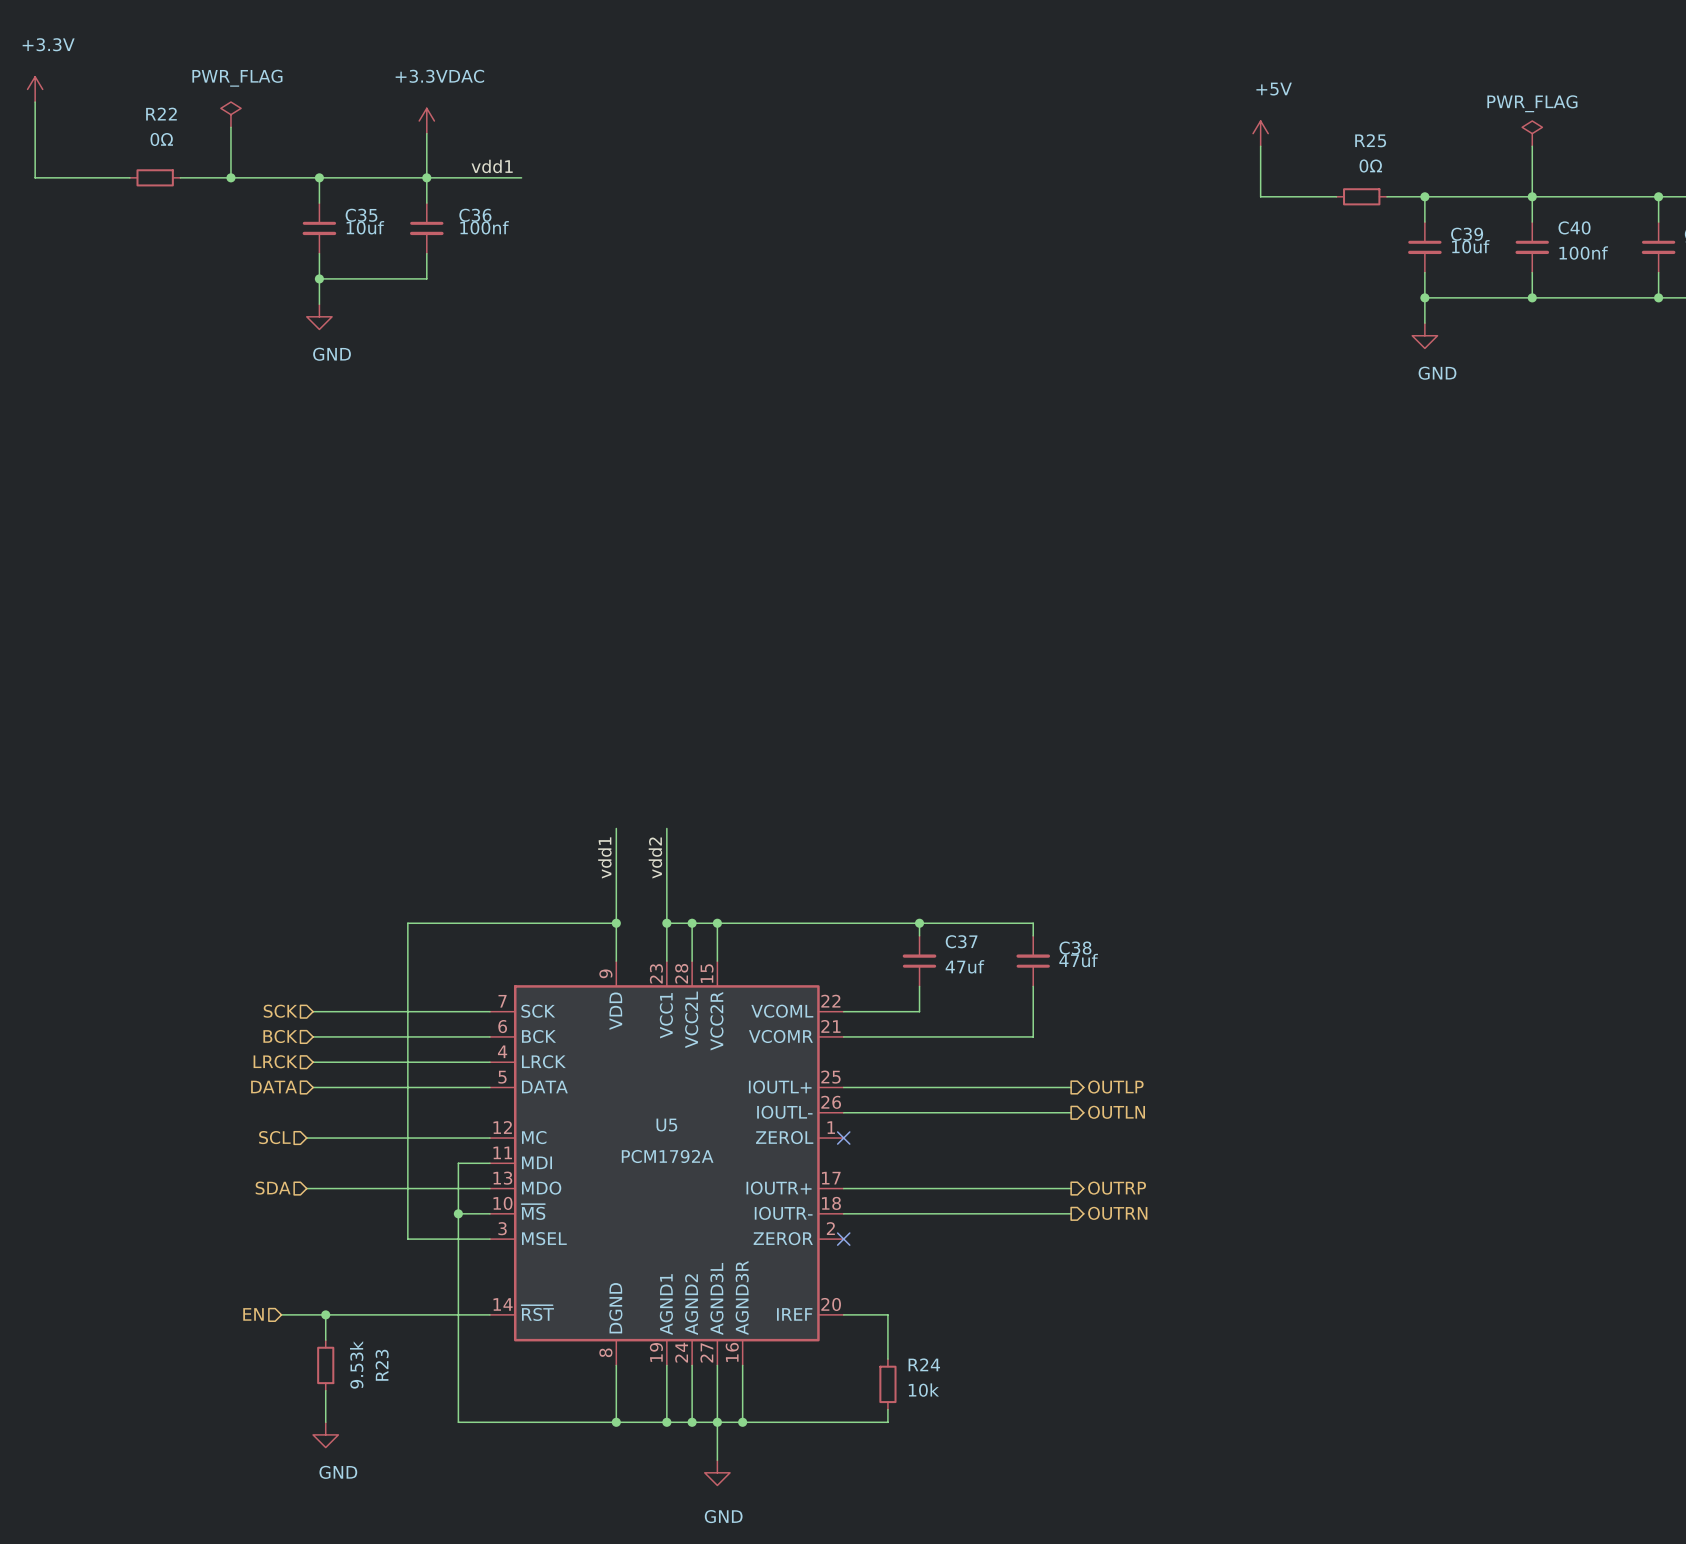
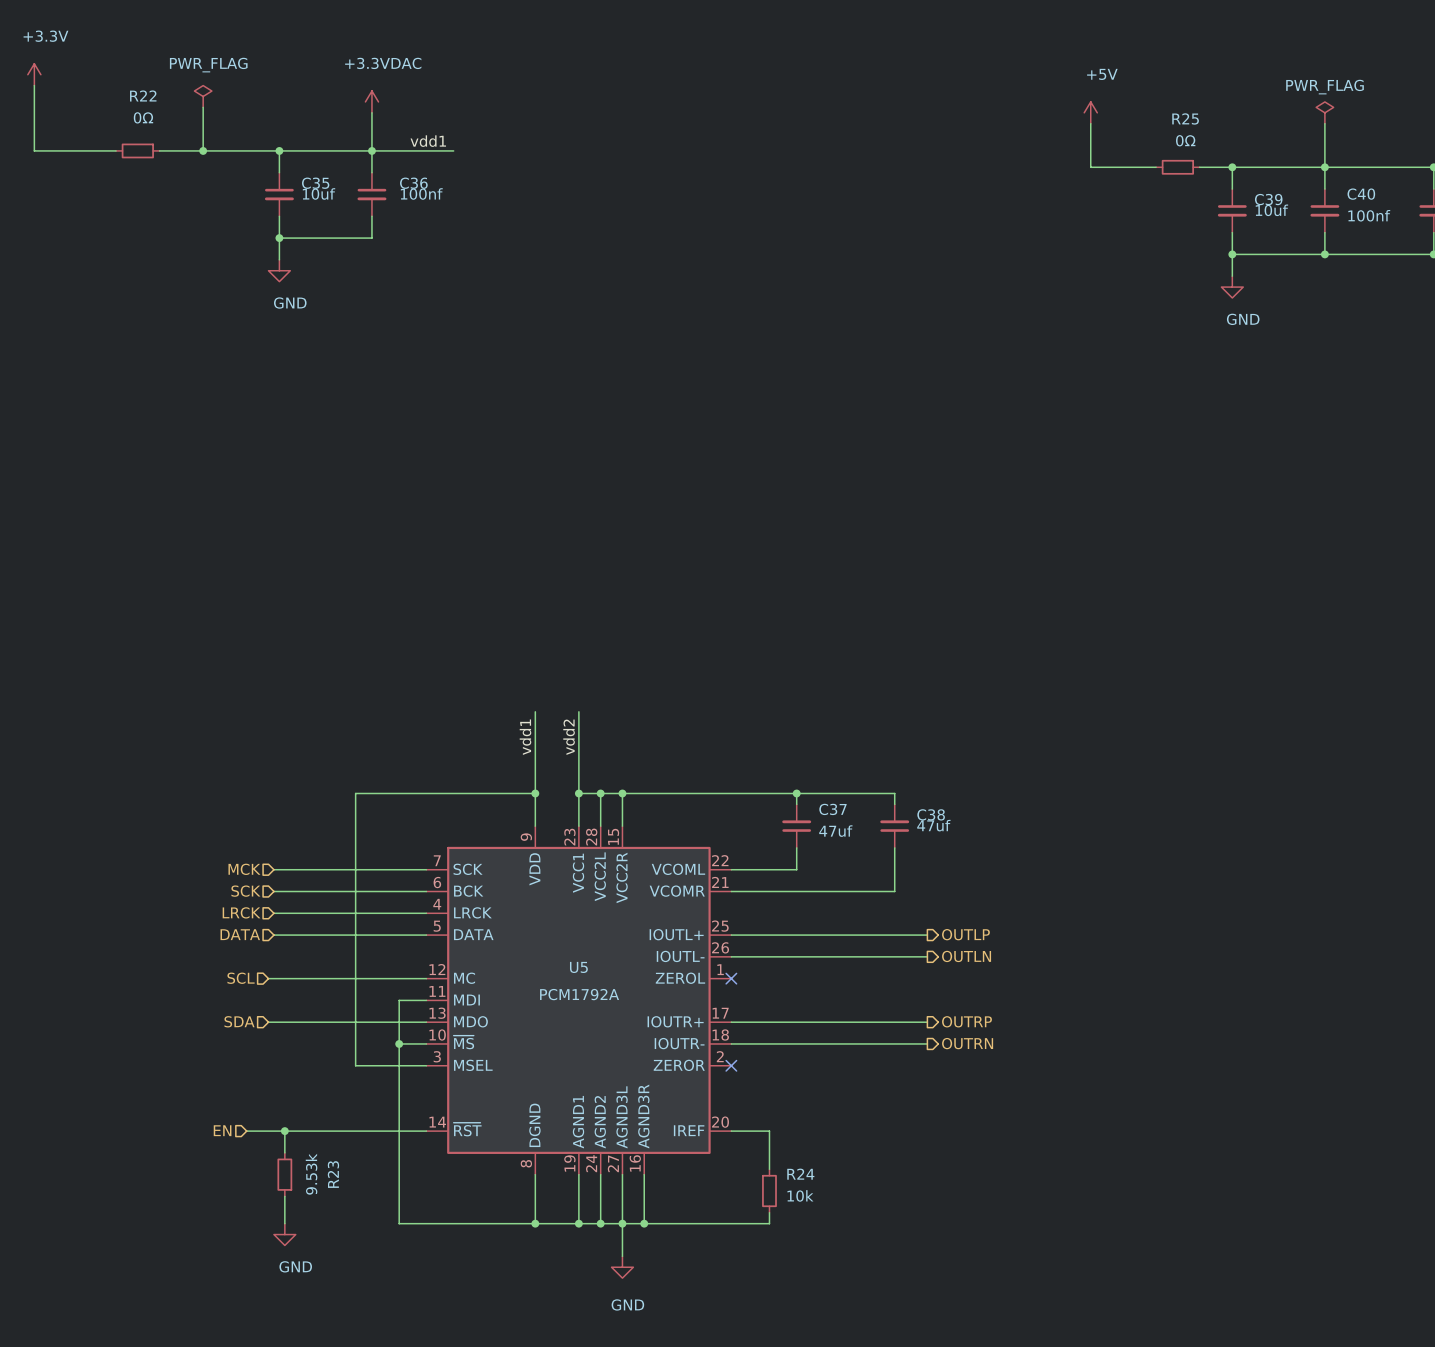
hierarchical label: SCK (280, 1011) -> MCK (244, 869)
hierarchical label: BCK (280, 1036) -> SCK (245, 891)

